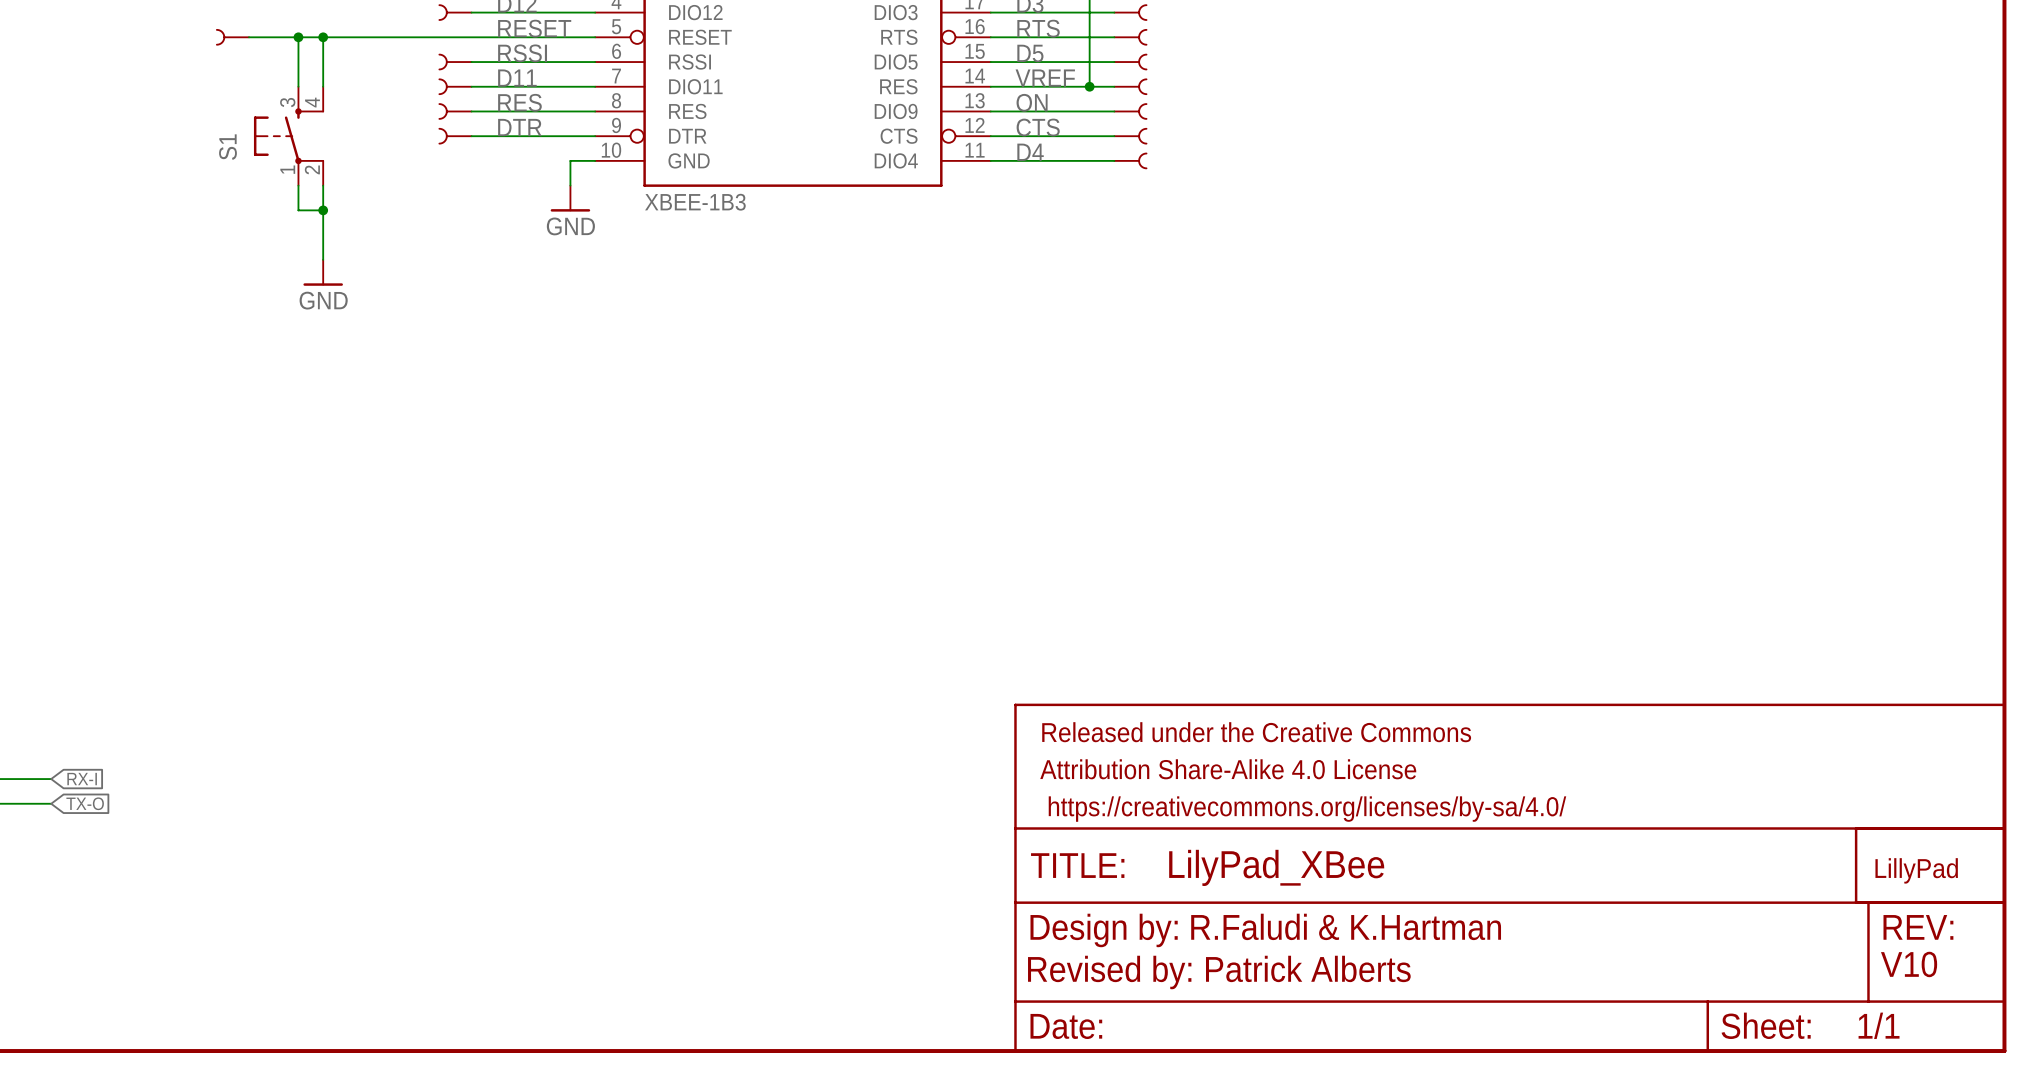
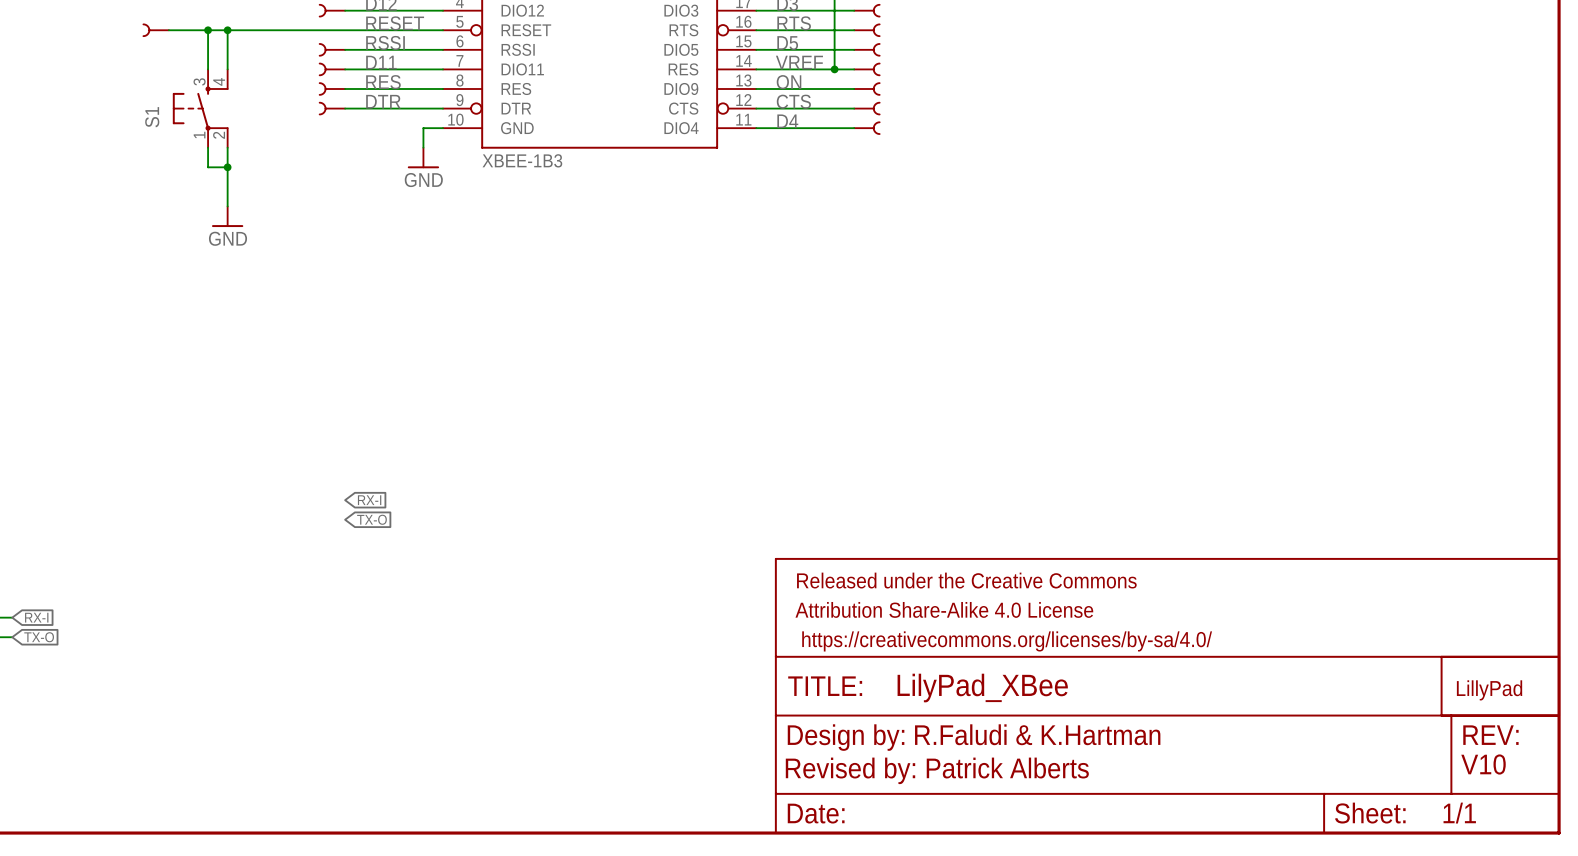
global label: none -> RX-I (369, 500)
global label: none -> TX-O (371, 519)

